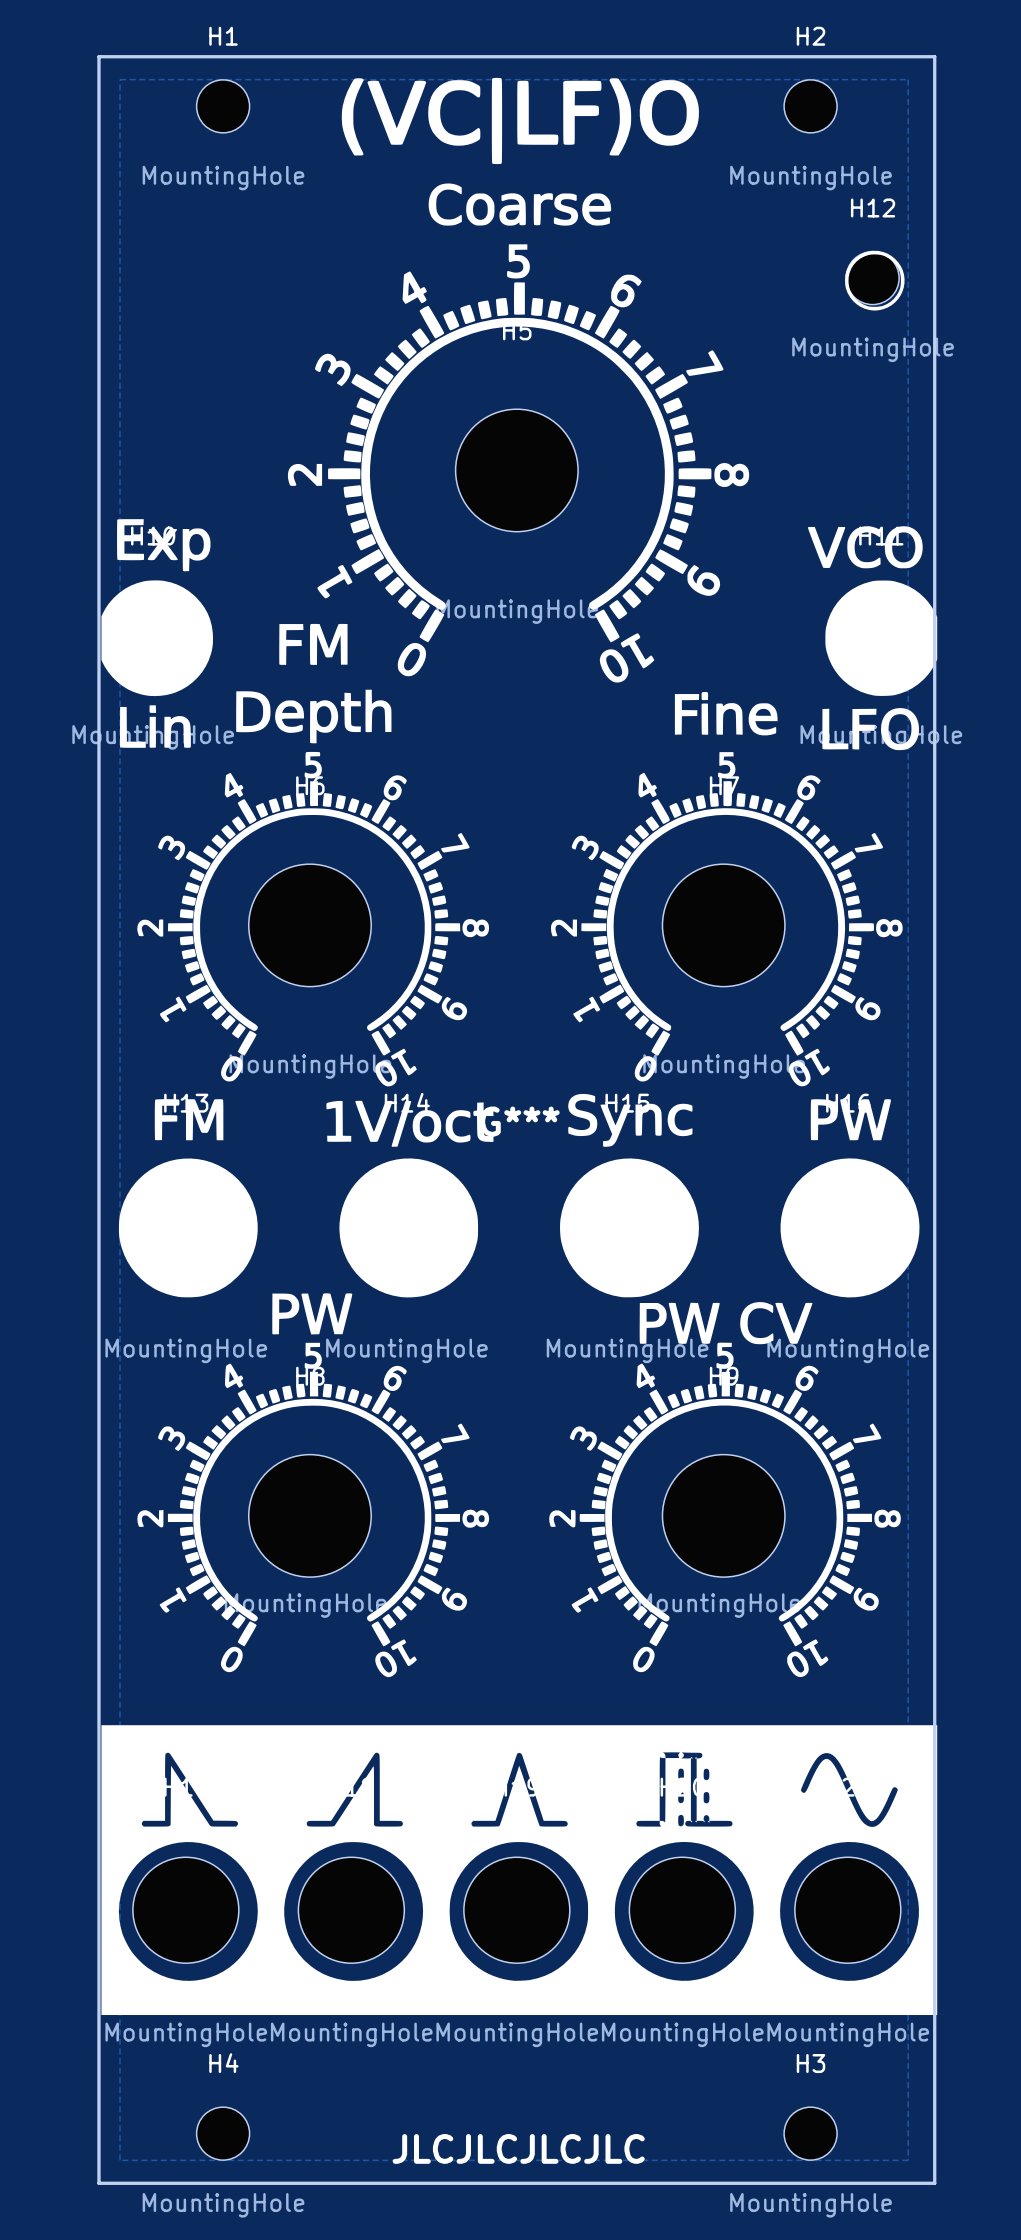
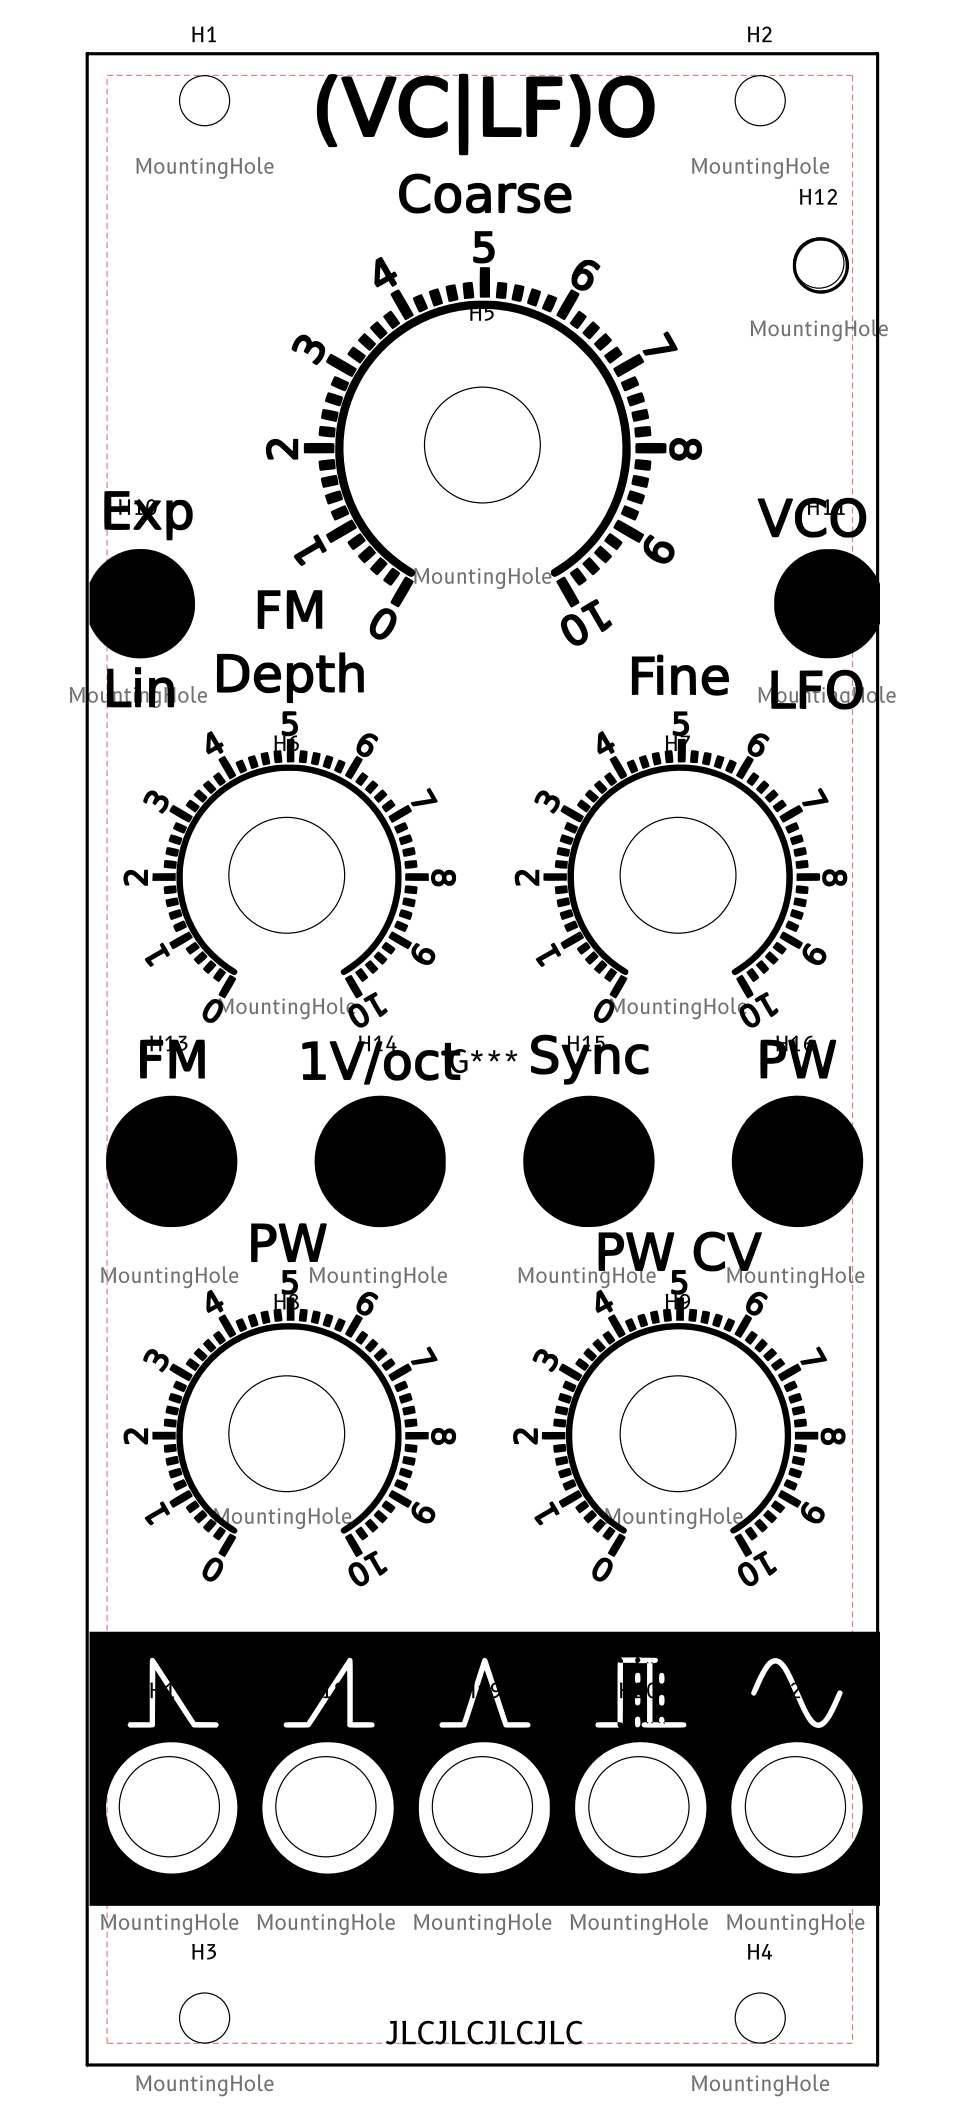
H4 name: H4 (223, 2063) -> H3 (204, 1951)
H3 name: H3 (810, 2063) -> H4 (759, 1951)

